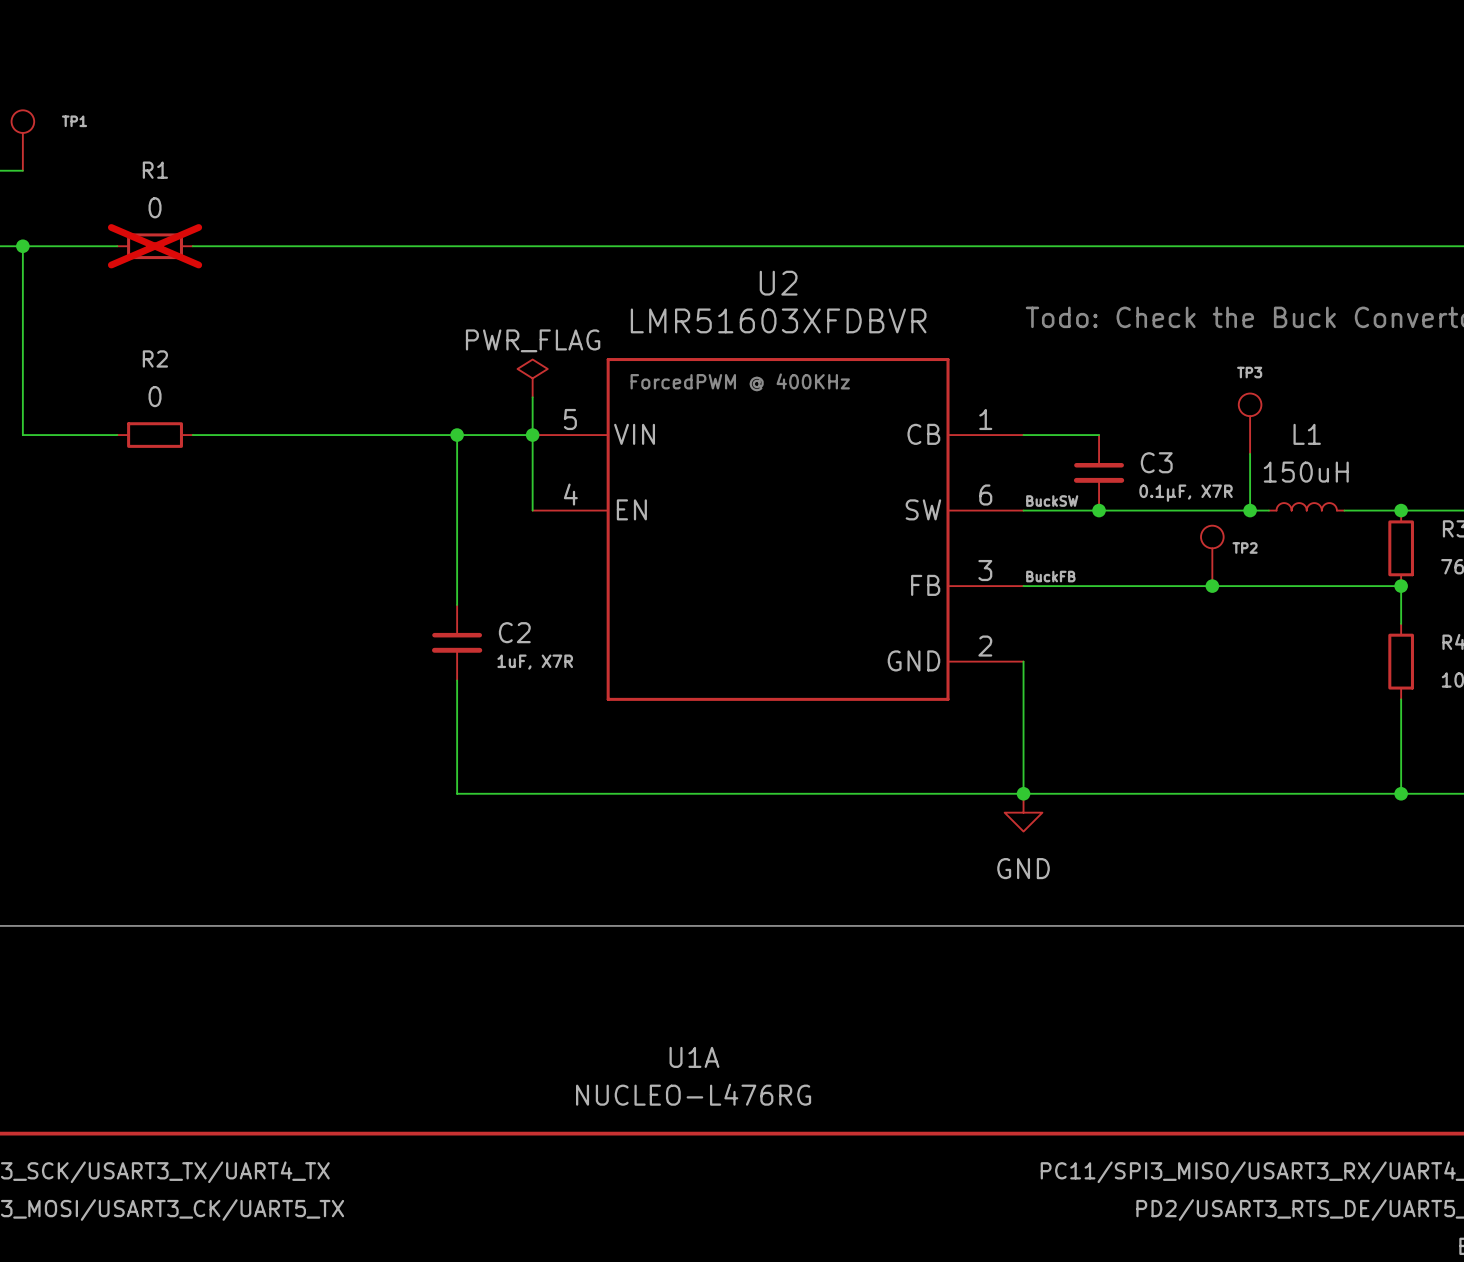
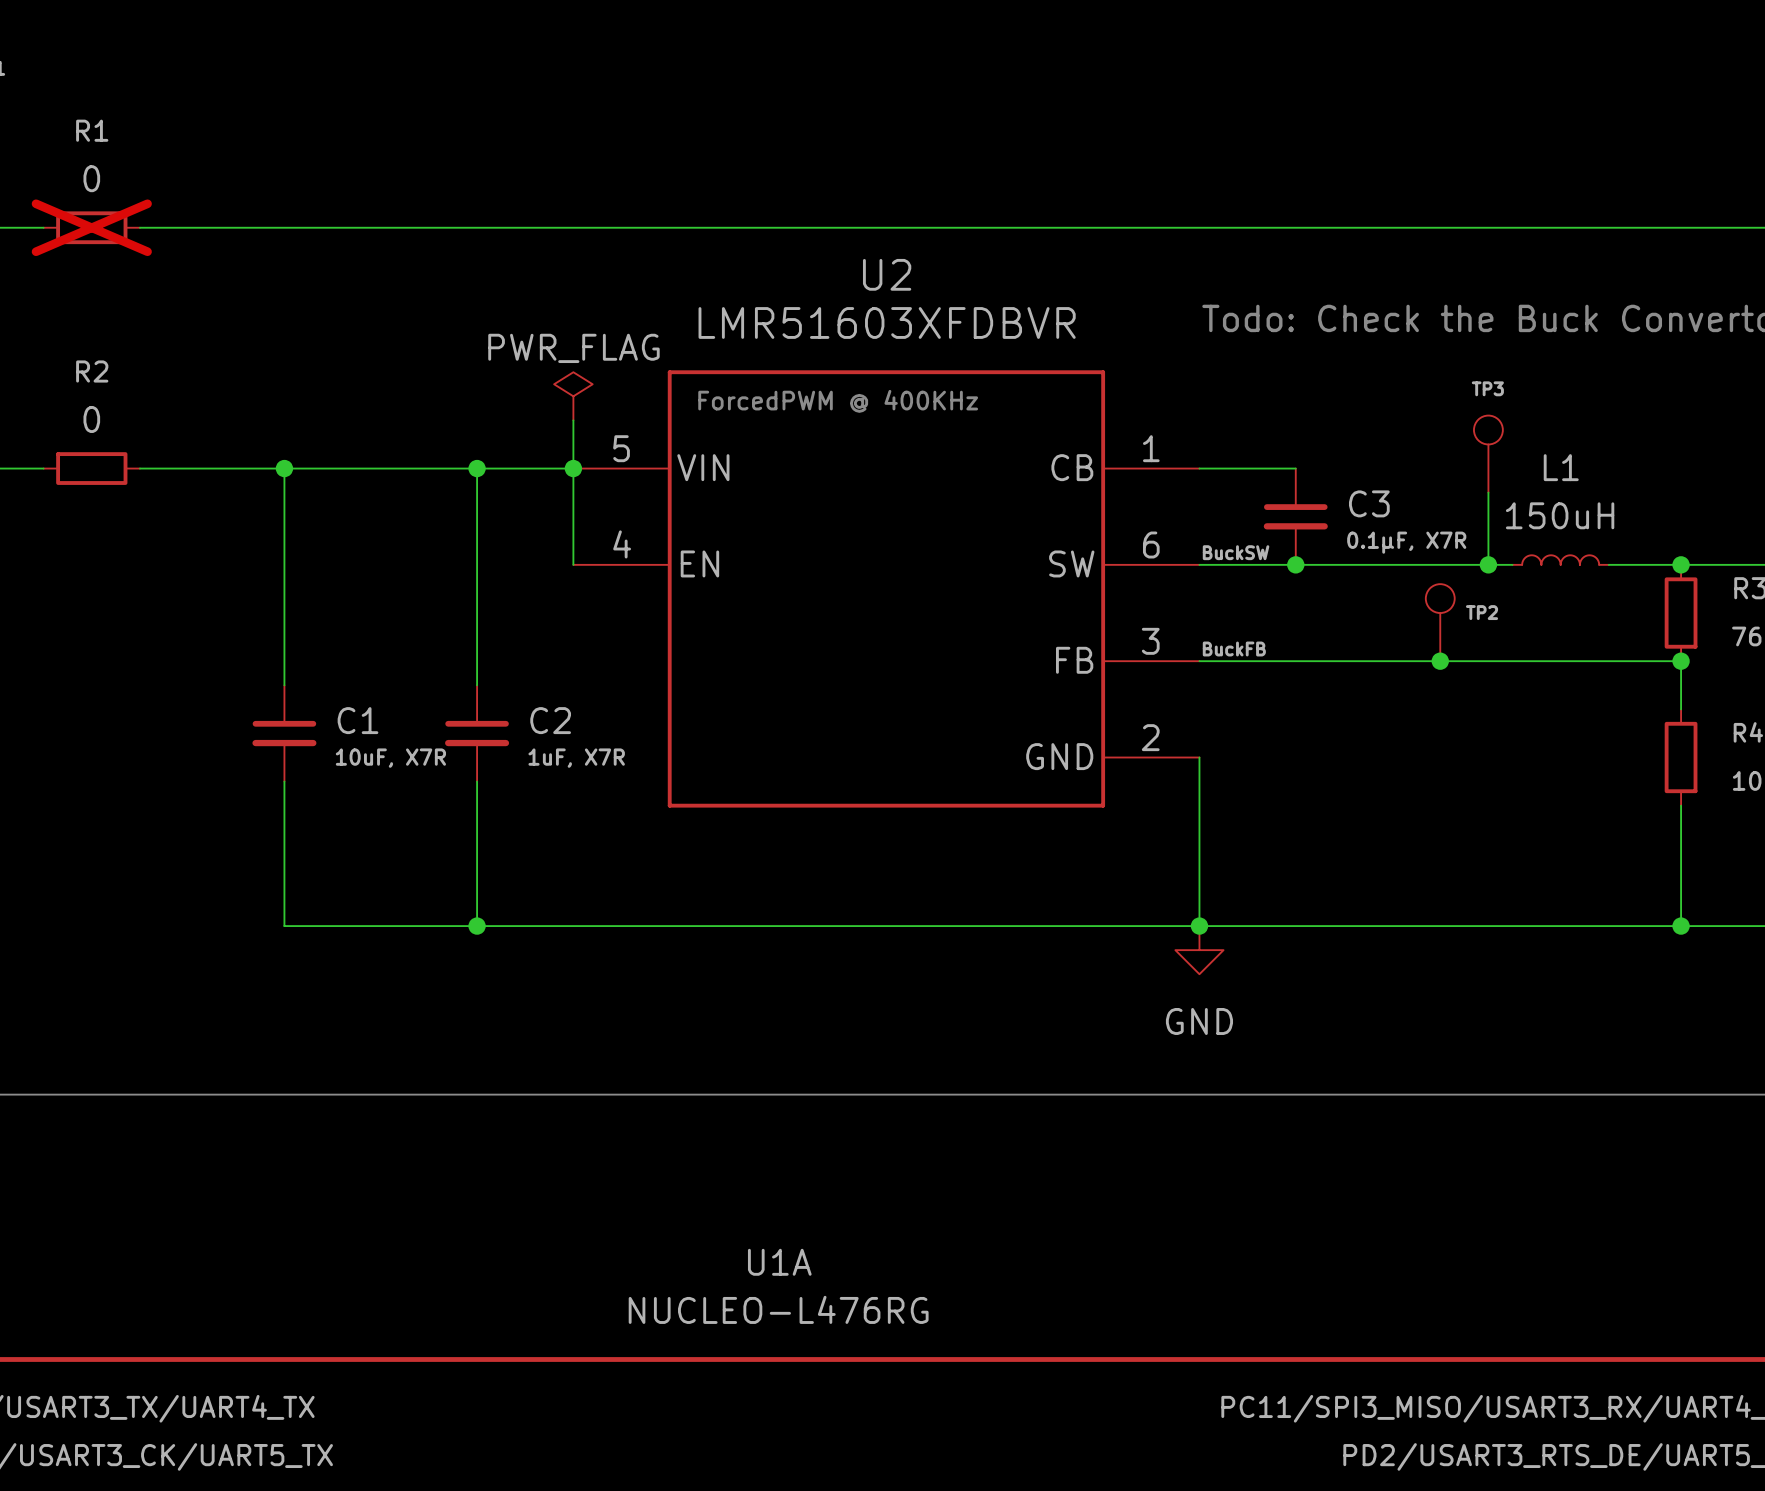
wire: none -> (284, 468) (284, 685)
junction: none -> (284, 468)
C1: none -> 10uF, X7R (284, 733)
wire: none -> (284, 781) (284, 926) (477, 926)
junction: none -> (477, 926)

